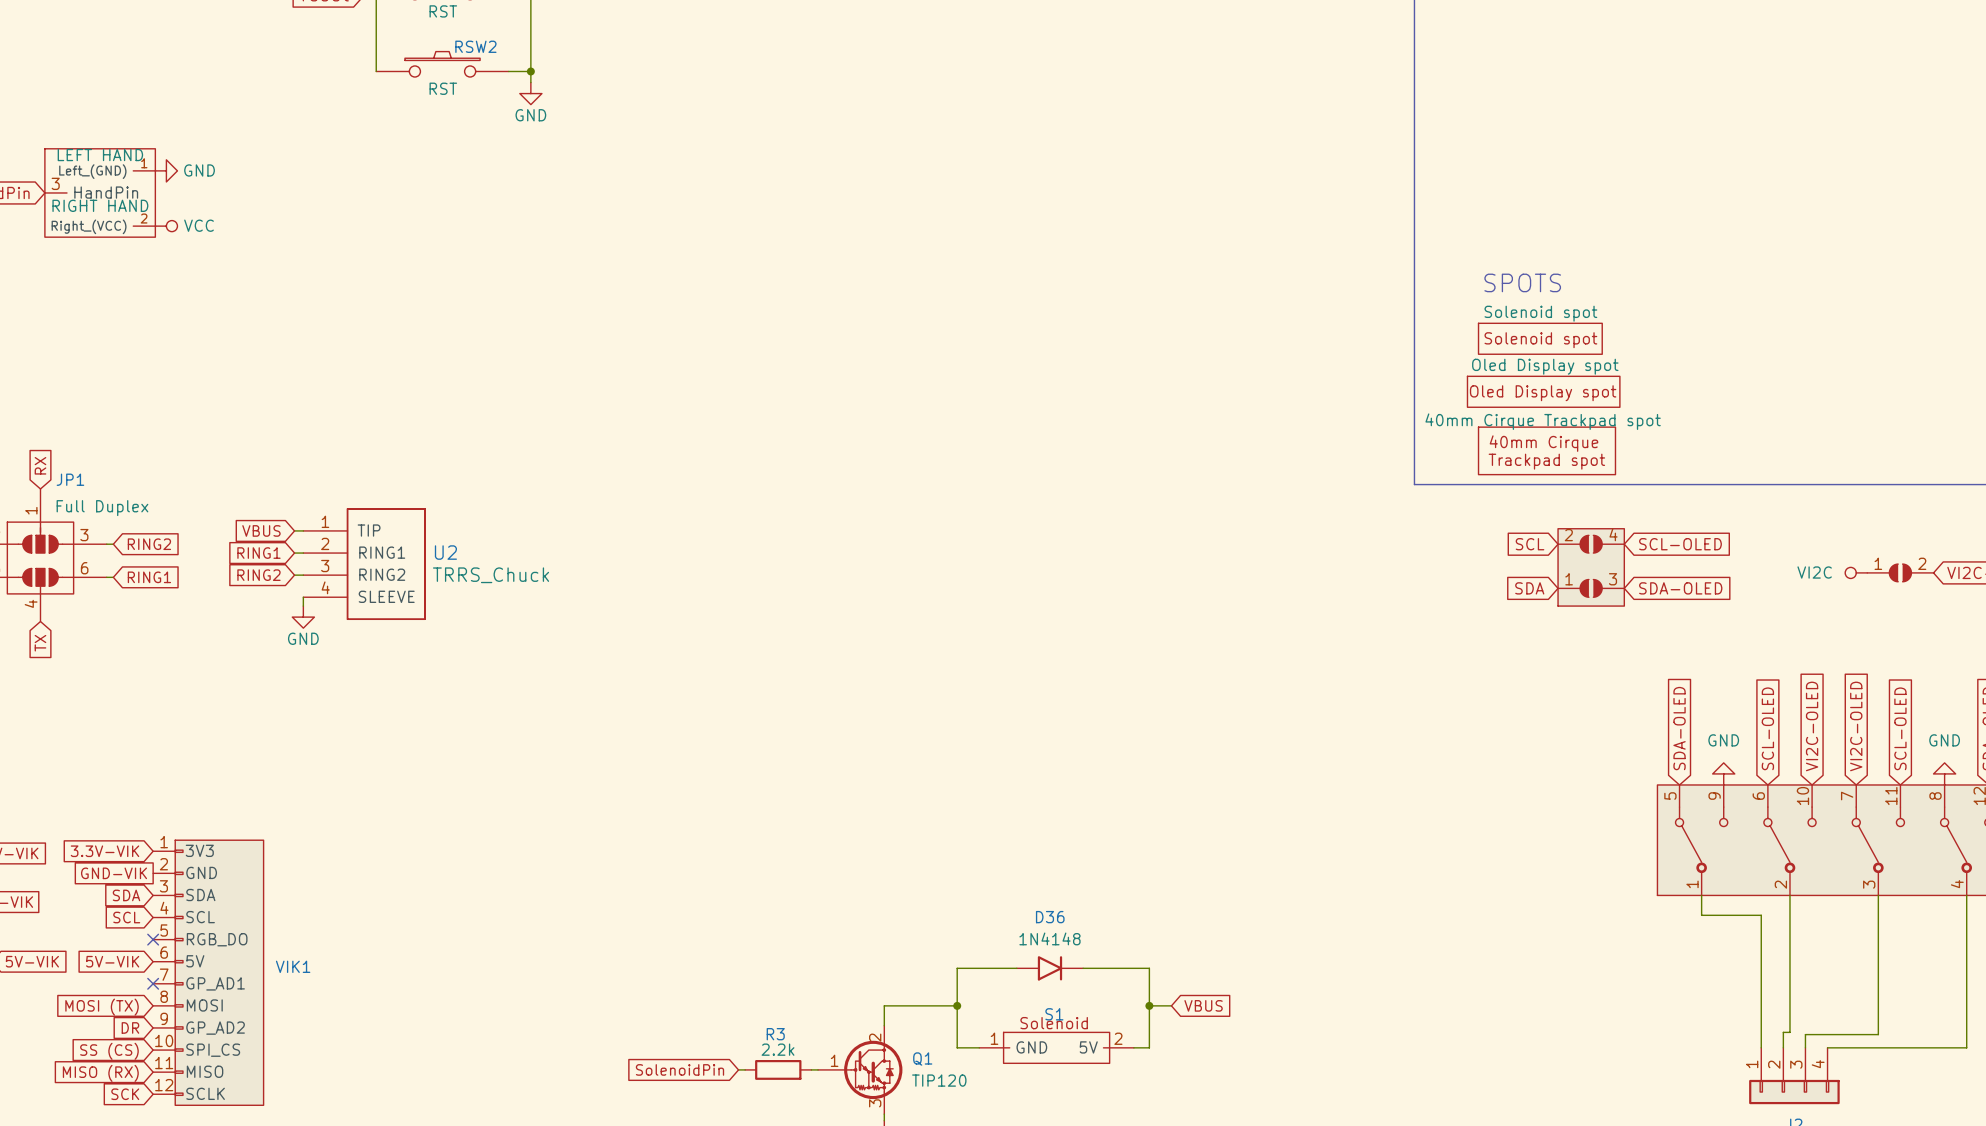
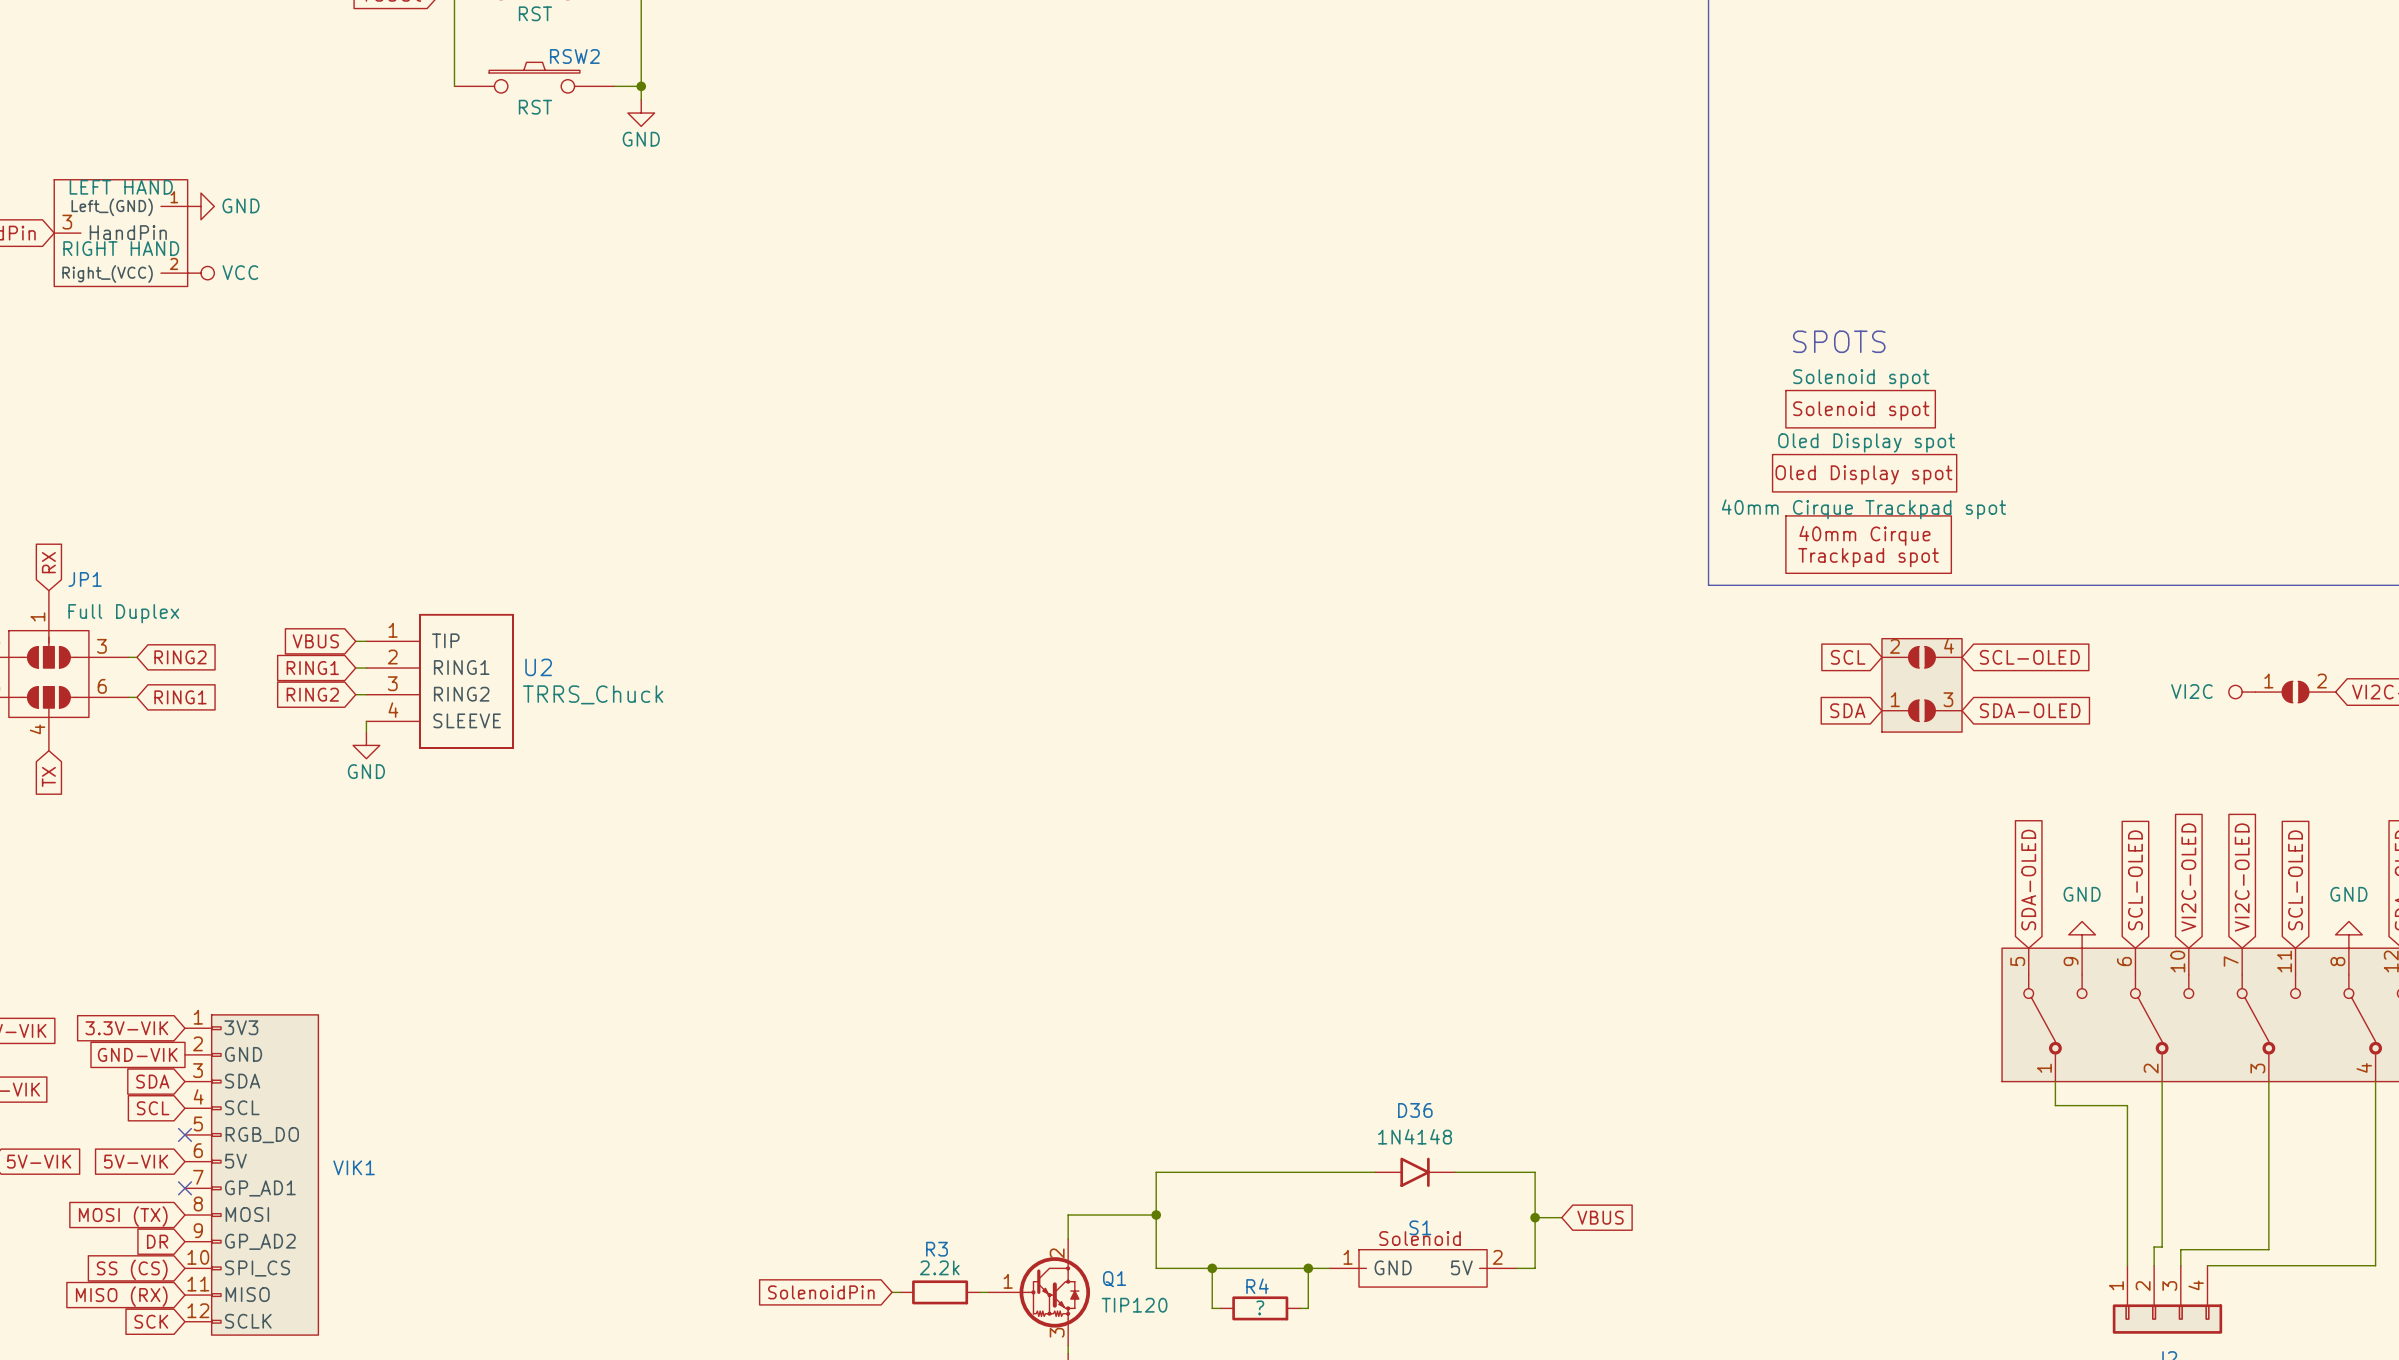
wire: (1016, 968) (957, 968) (957, 970) -> (1375, 1172) (1156, 1172)
D36 position: (1049, 968) -> (1415, 1172)
wire: (1083, 968) (1149, 968) (1149, 1047) (1133, 1047) -> (1455, 1172) (1535, 1172) (1535, 1268) (1516, 1268)
wire: (1149, 1005) (1171, 1005) -> (1535, 1217) (1561, 1217)
junction: (1149, 1005) -> none
global label position: VBUS (1203, 1005) -> VBUS (1600, 1217)
junction: none -> (1535, 1217)
wire: (957, 1047) (979, 1047) -> (1156, 1265) (1156, 1268) (1329, 1268)
S1 position: (1056, 1047) -> (1423, 1268)
wire: none -> (1212, 1268) (1212, 1308) (1220, 1308)
junction: none -> (1212, 1268)
wire: none -> (1308, 1268) (1308, 1308) (1300, 1308)
junction: none -> (1308, 1268)
R4: none -> ? (1260, 1308)

